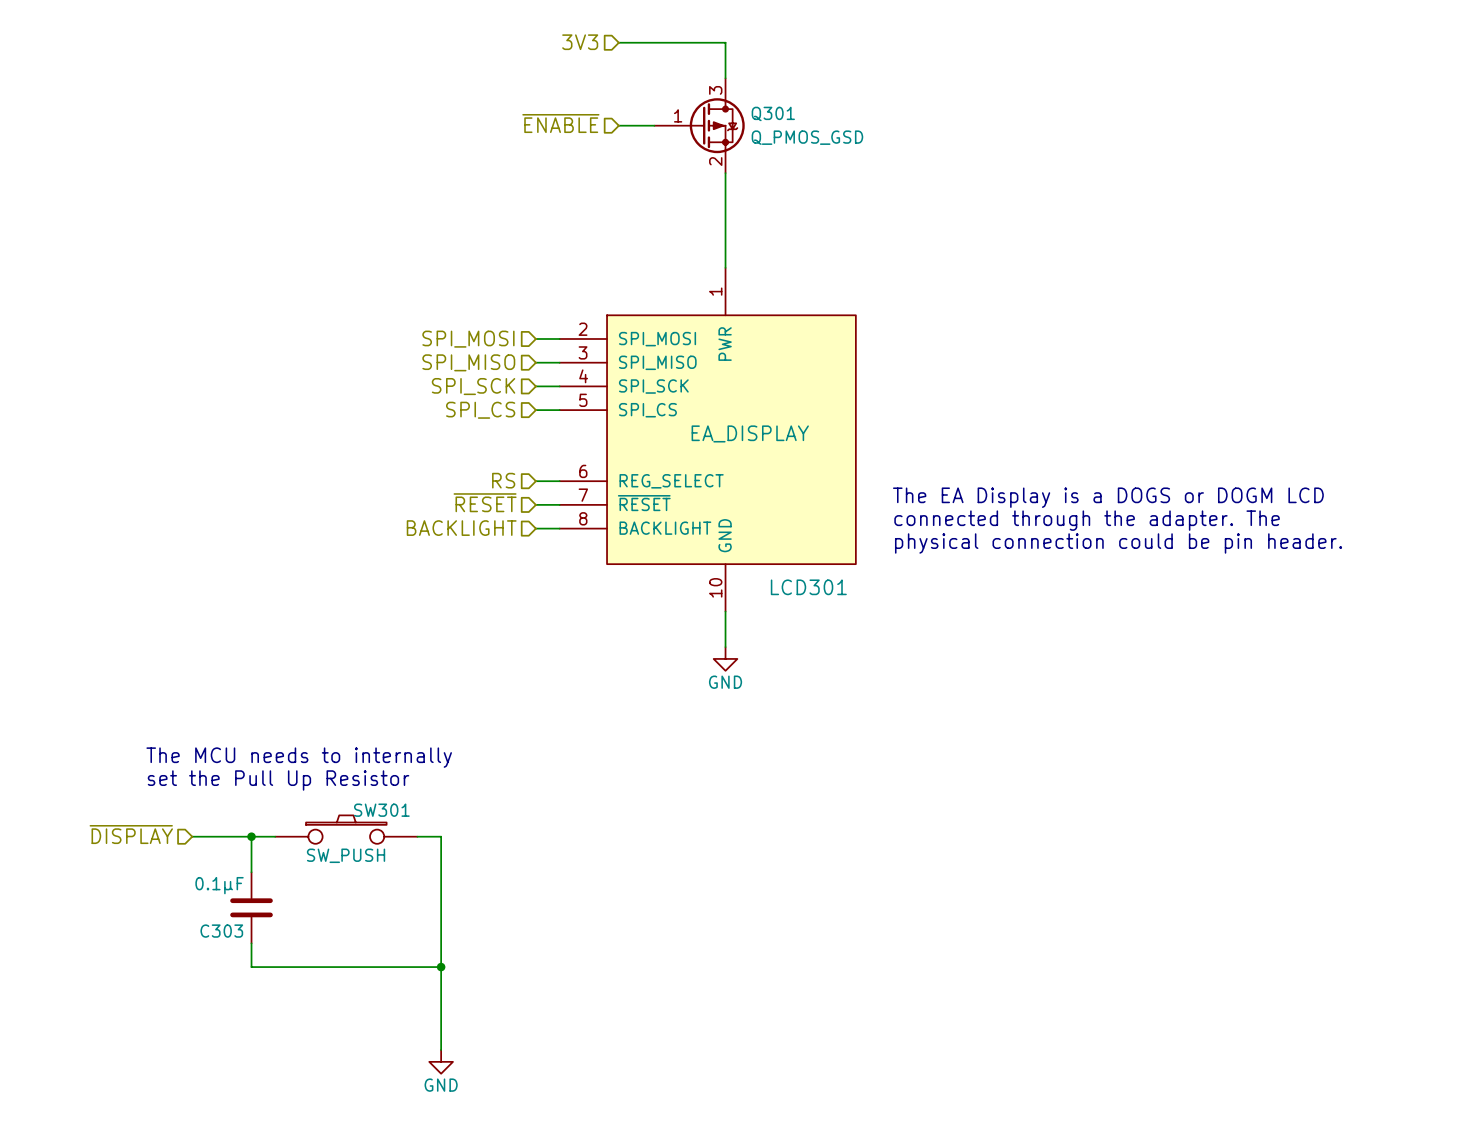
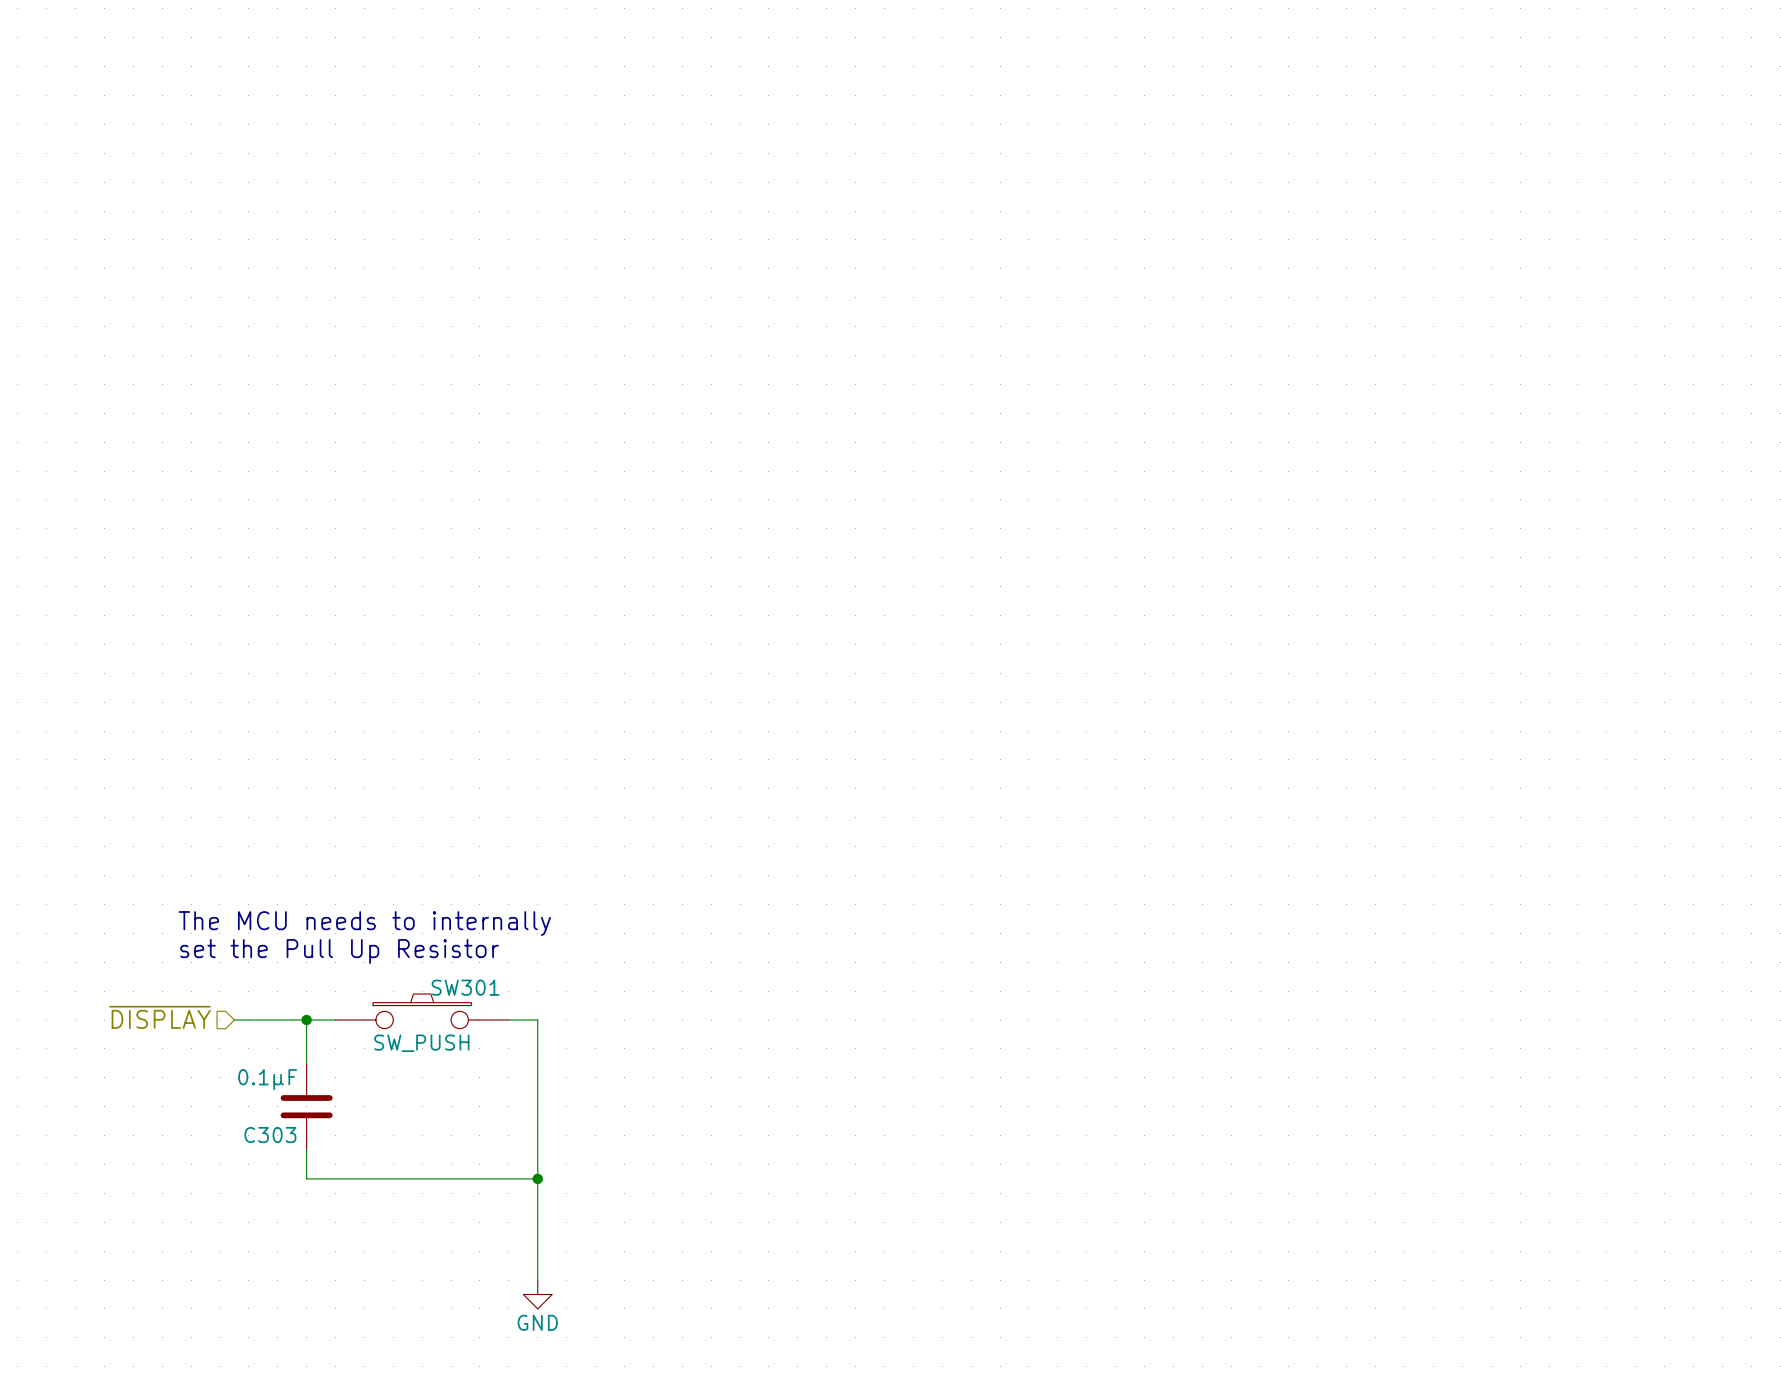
hierarchical label: 3V3 (580, 42) -> none
wire: (618, 42) (725, 42) (725, 78) -> none
hierarchical label: ~{ENABLE} (560, 123) -> none
wire: (618, 125) (654, 125) -> none
Q301: Q_PMOS_GSD (699, 125) -> none
wire: (725, 173) (725, 267) -> none
wire: (535, 338) (559, 338) -> none
hierarchical label: SPI_MOSI (468, 339) -> none
hierarchical label: SPI_MISO (468, 362) -> none
wire: (535, 362) (559, 362) -> none
hierarchical label: SPI_SCK (473, 386) -> none
wire: (535, 386) (559, 386) -> none
hierarchical label: SPI_CS (480, 410) -> none
wire: (535, 410) (559, 410) -> none
LCD301: EA_DISPLAY (707, 439) -> none
hierarchical label: RS (503, 480) -> none
wire: (535, 481) (559, 481) -> none
text: The EA Display is a DOGS or DOGM LCD (1108, 497) -> none
hierarchical label: ~{RESET} (485, 502) -> none
wire: (535, 504) (559, 504) -> none
text: connected through the adapter. The (1087, 520) -> none
hierarchical label: BACKLIGHT (461, 528) -> none
wire: (535, 528) (559, 528) -> none
text: physical connection could be pin header. (1118, 543) -> none
wire: (725, 611) (725, 647) -> none
power symbol: GND (725, 658) -> none

